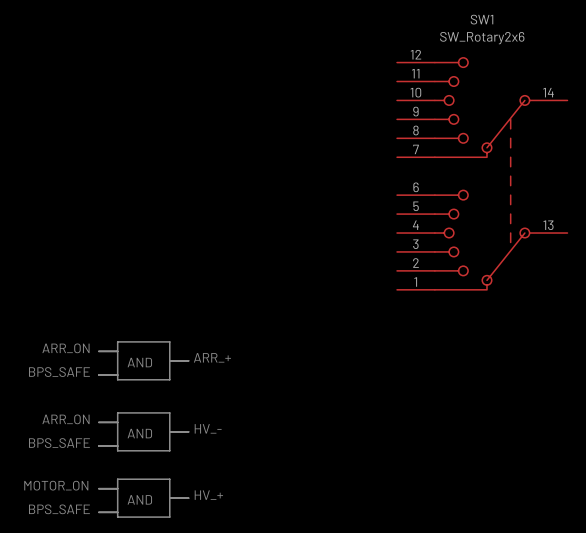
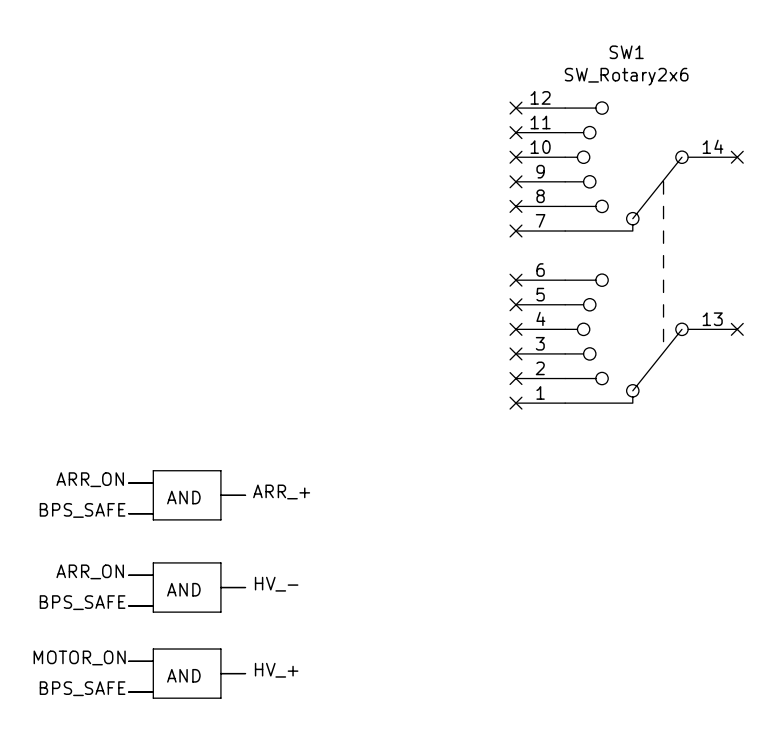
no-connect mark: none -> (516, 108)
no-connect mark: none -> (516, 132)
no-connect mark: none -> (516, 157)
no-connect mark: none -> (737, 157)
no-connect mark: none -> (516, 181)
no-connect mark: none -> (516, 206)
no-connect mark: none -> (516, 231)
no-connect mark: none -> (516, 280)
no-connect mark: none -> (516, 304)
no-connect mark: none -> (516, 329)
no-connect mark: none -> (737, 329)
no-connect mark: none -> (516, 353)
no-connect mark: none -> (516, 378)
no-connect mark: none -> (516, 403)

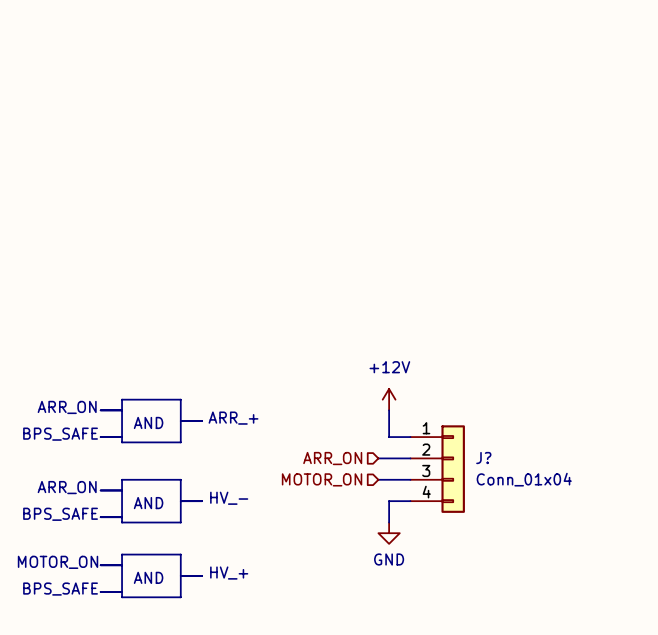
no-connect mark: (516, 108) -> none
no-connect mark: (516, 132) -> none
no-connect mark: (516, 157) -> none
no-connect mark: (737, 157) -> none
no-connect mark: (516, 181) -> none
no-connect mark: (516, 206) -> none
no-connect mark: (516, 231) -> none
SW1: SW_Rotary2x6 (626, 252) -> none
no-connect mark: (516, 280) -> none
no-connect mark: (516, 304) -> none
no-connect mark: (516, 329) -> none
no-connect mark: (737, 329) -> none
no-connect mark: (516, 353) -> none
no-connect mark: (516, 378) -> none
no-connect mark: (516, 403) -> none
power symbol: none -> +12V (389, 399)
wire: none -> (389, 410) (389, 437) (410, 437)
hierarchical label: none -> ARR_ON (332, 458)
wire: none -> (378, 458) (410, 458)
J?: none -> Conn_01x04 (437, 469)
wire: none -> (378, 479) (410, 479)
hierarchical label: none -> MOTOR_ON (322, 479)
wire: none -> (410, 501) (389, 501) (389, 522)
power symbol: none -> GND (389, 533)

